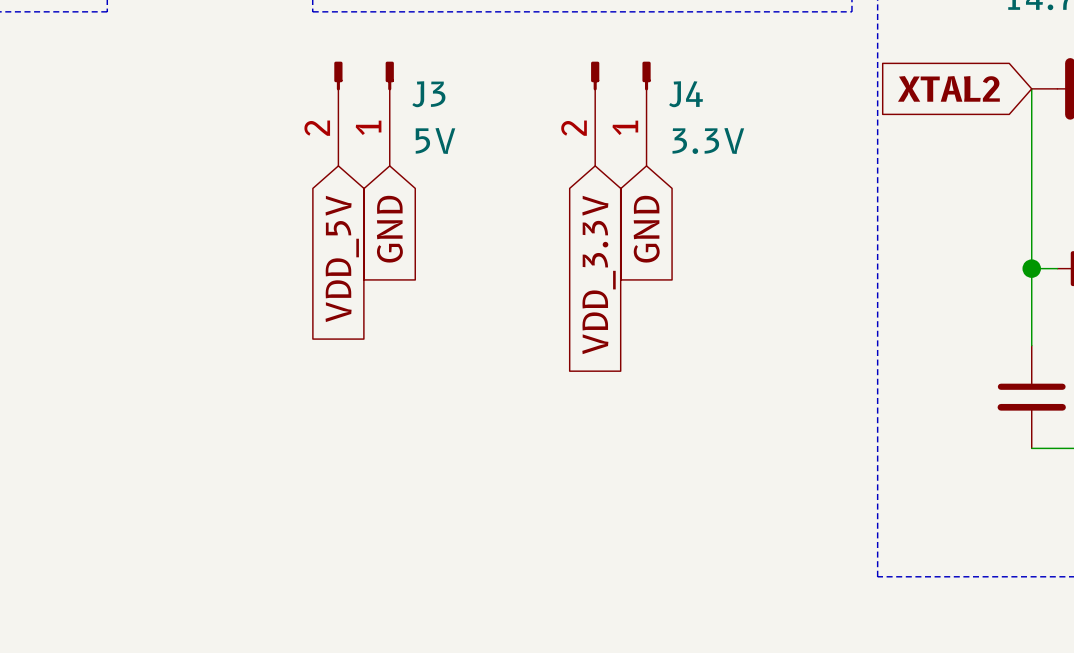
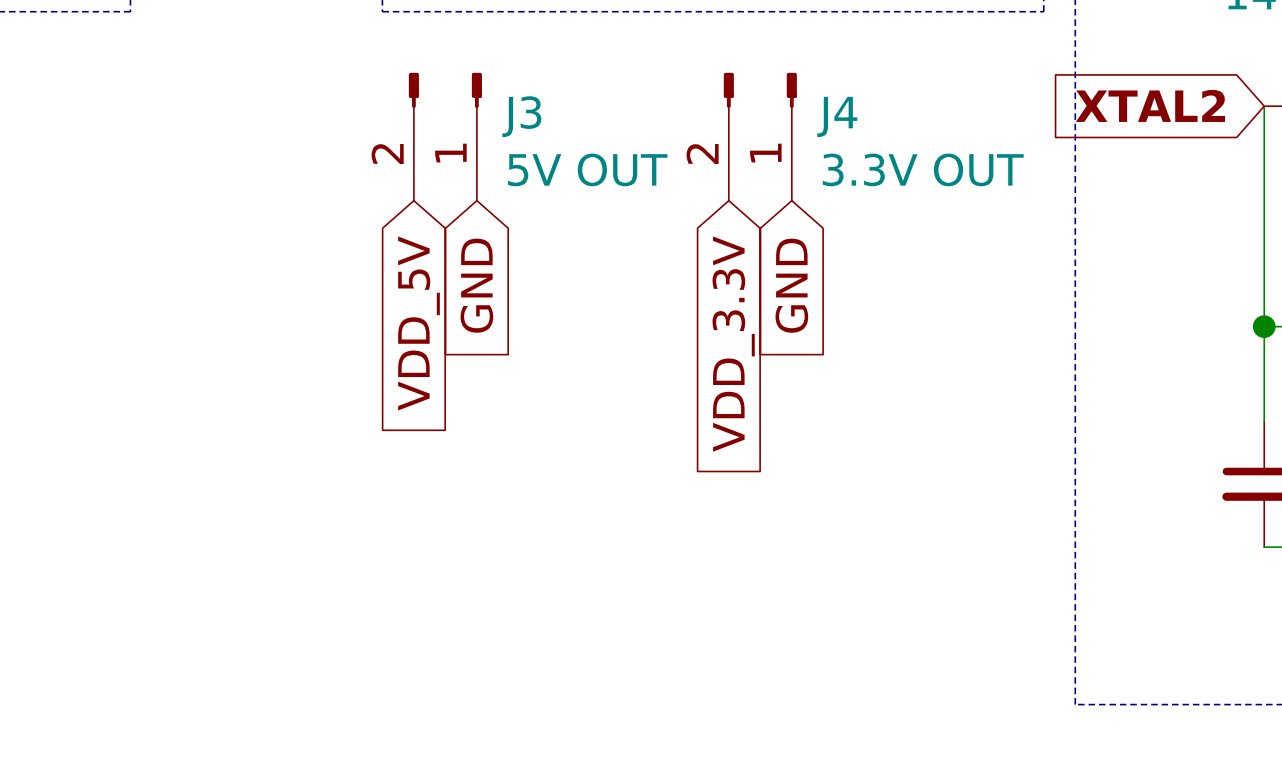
J3 value: 5V (435, 140) -> 5V OUT (587, 169)
J4 value: 3.3V (708, 140) -> 3.3V OUT (923, 169)

